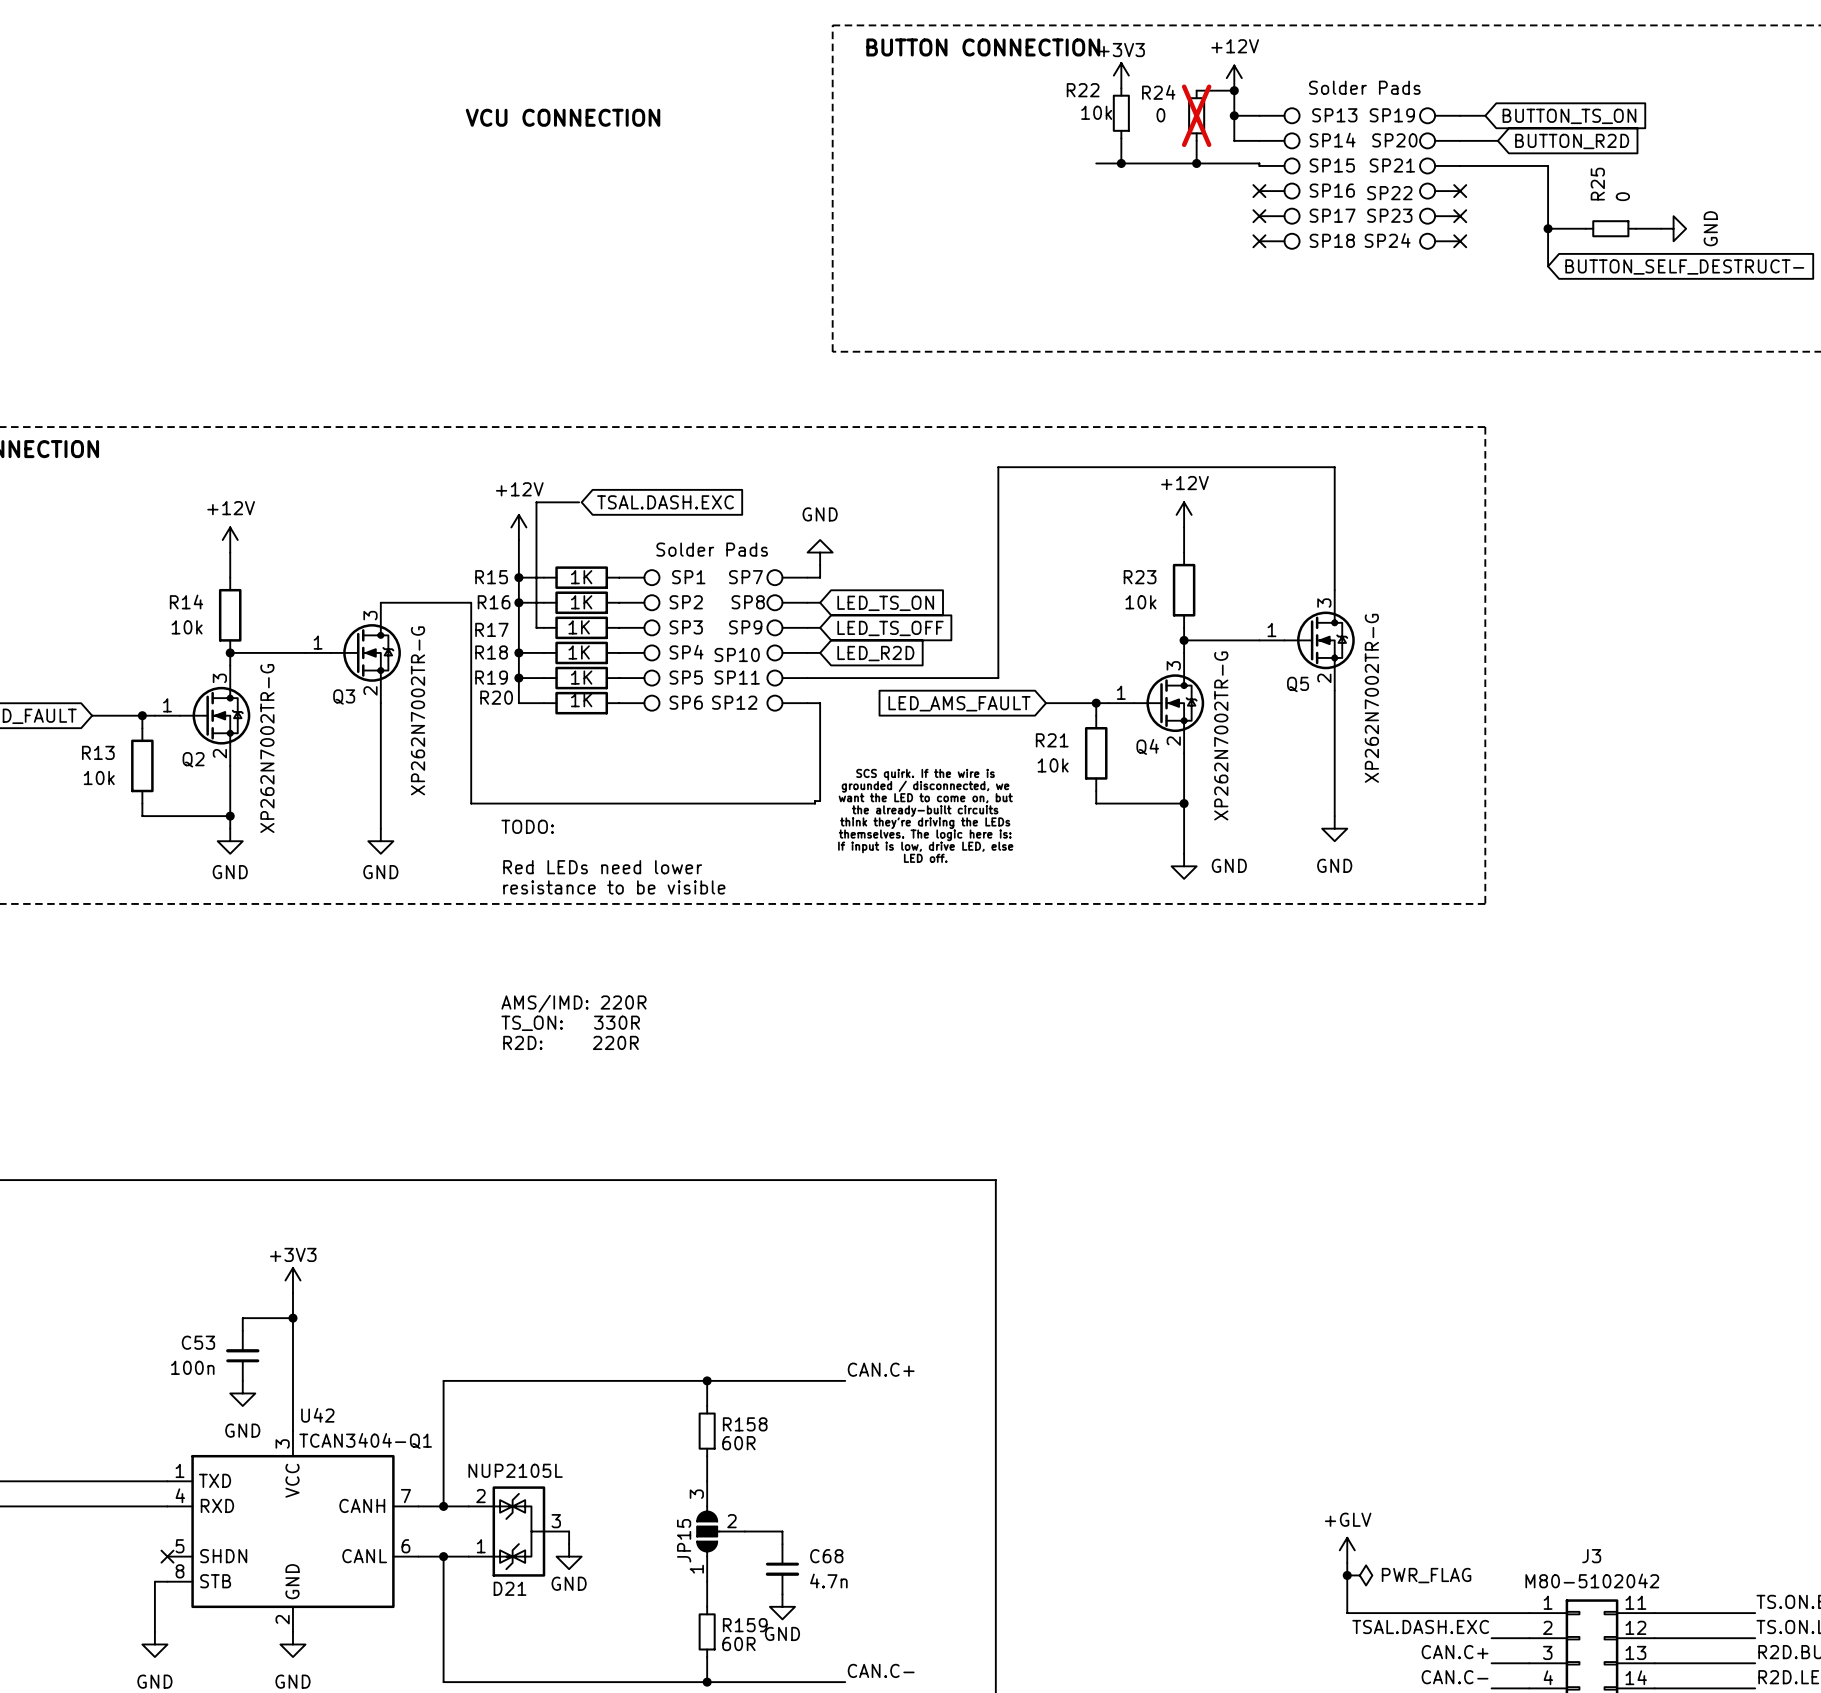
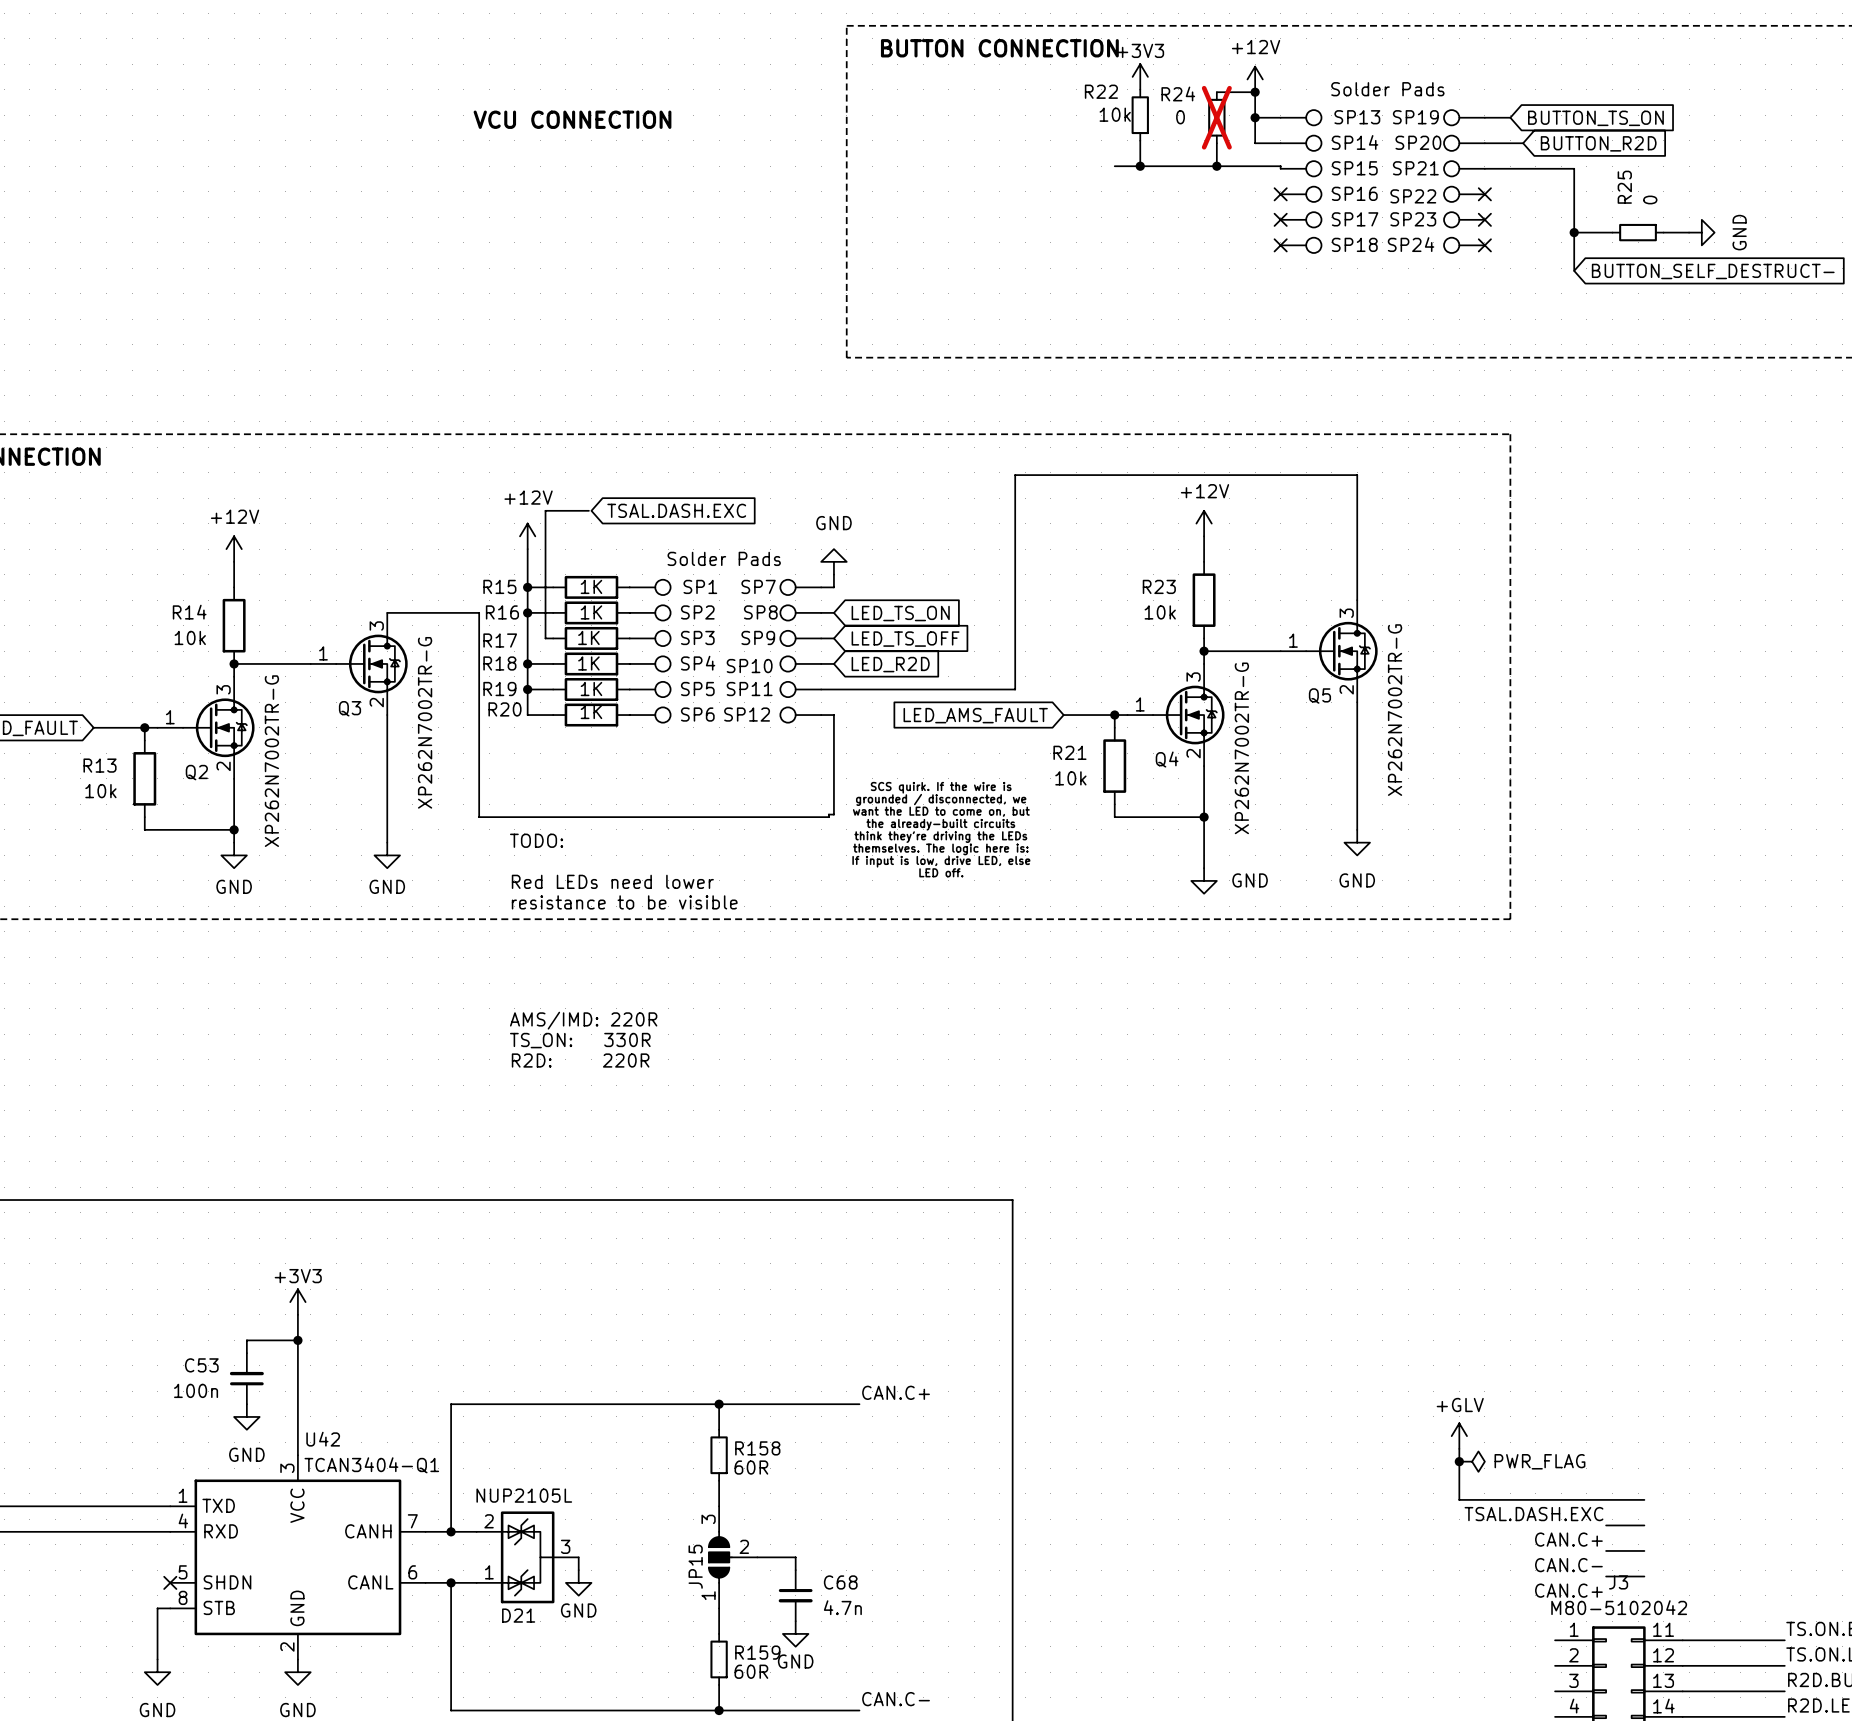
junction: none -> (1459, 1461)
label: none -> CAN.C+ (1568, 1539)
label: none -> CAN.C- (1568, 1565)
power symbol position: +GLV (1347, 1550) -> +GLV (1459, 1436)
wire: (1347, 1562) (1347, 1613) (1529, 1613) -> (1459, 1448) (1459, 1499) (1644, 1499)
label: none -> CAN.C+ (1568, 1590)
junction: (1347, 1575) -> none
power symbol position: PWR_FLAG (1359, 1575) -> PWR_FLAG (1472, 1461)
label position: TSAL.DASH.EXC (1420, 1627) -> TSAL.DASH.EXC (1533, 1514)
wire: (1491, 1638) (1529, 1638) -> (1606, 1525) (1644, 1525)
label: CAN.C+ (1455, 1652) -> none
wire: (1491, 1663) (1529, 1663) -> (1606, 1550) (1644, 1550)
label: CAN.C- (1455, 1677) -> none
wire: (1491, 1688) (1529, 1688) -> (1606, 1576) (1644, 1576)

